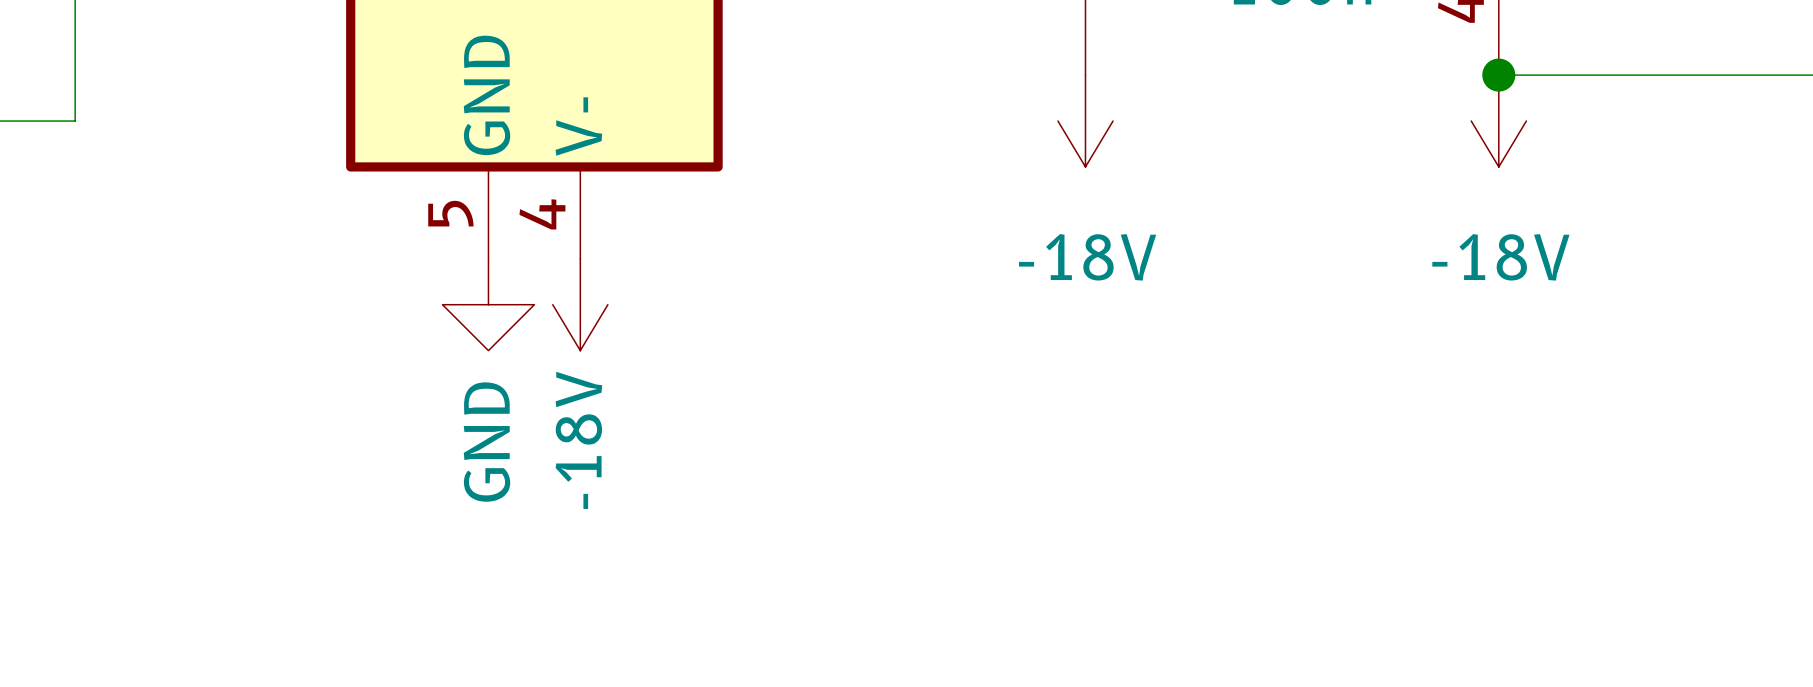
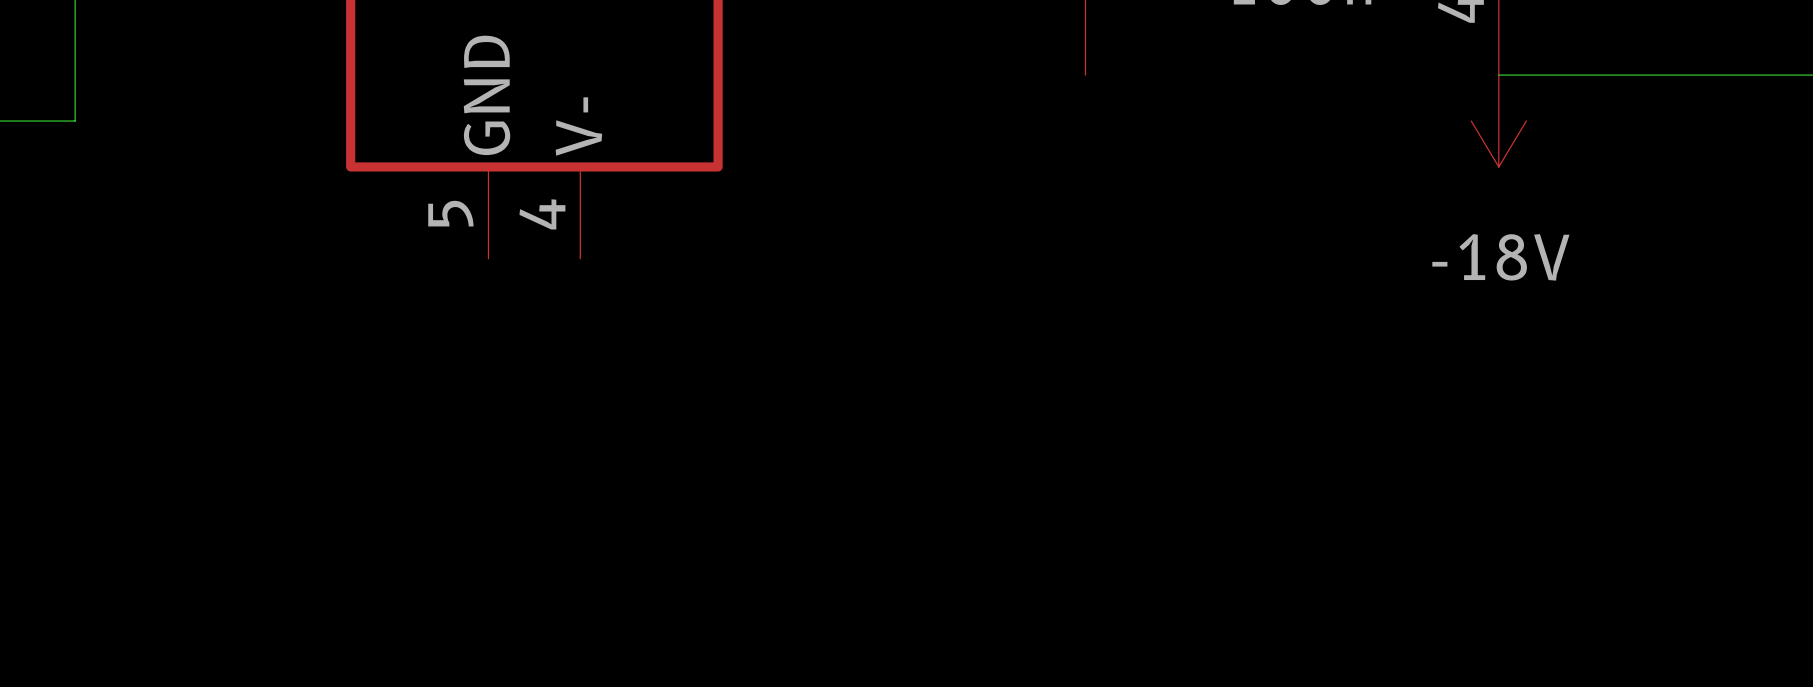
junction: (1498, 75) -> none
power symbol: -18V (1085, 121) -> none
power symbol: GND (488, 304) -> none
power symbol: -18V (580, 304) -> none

